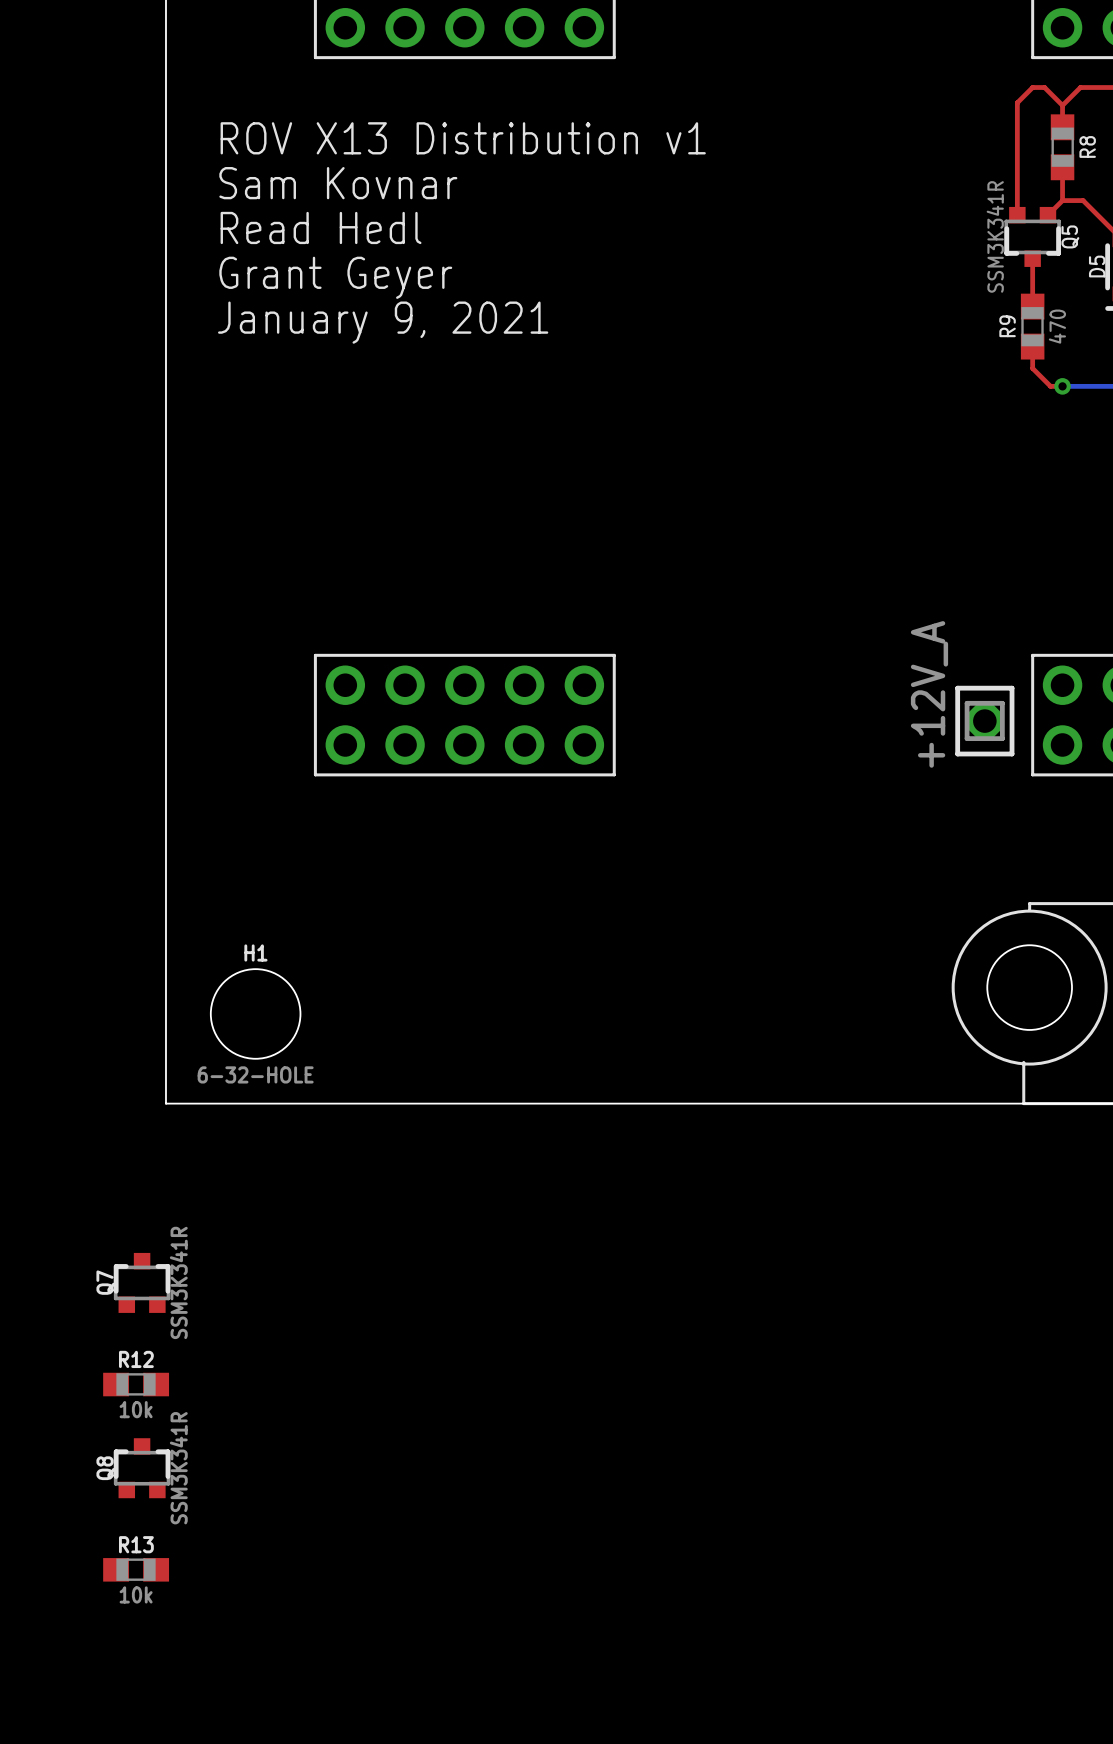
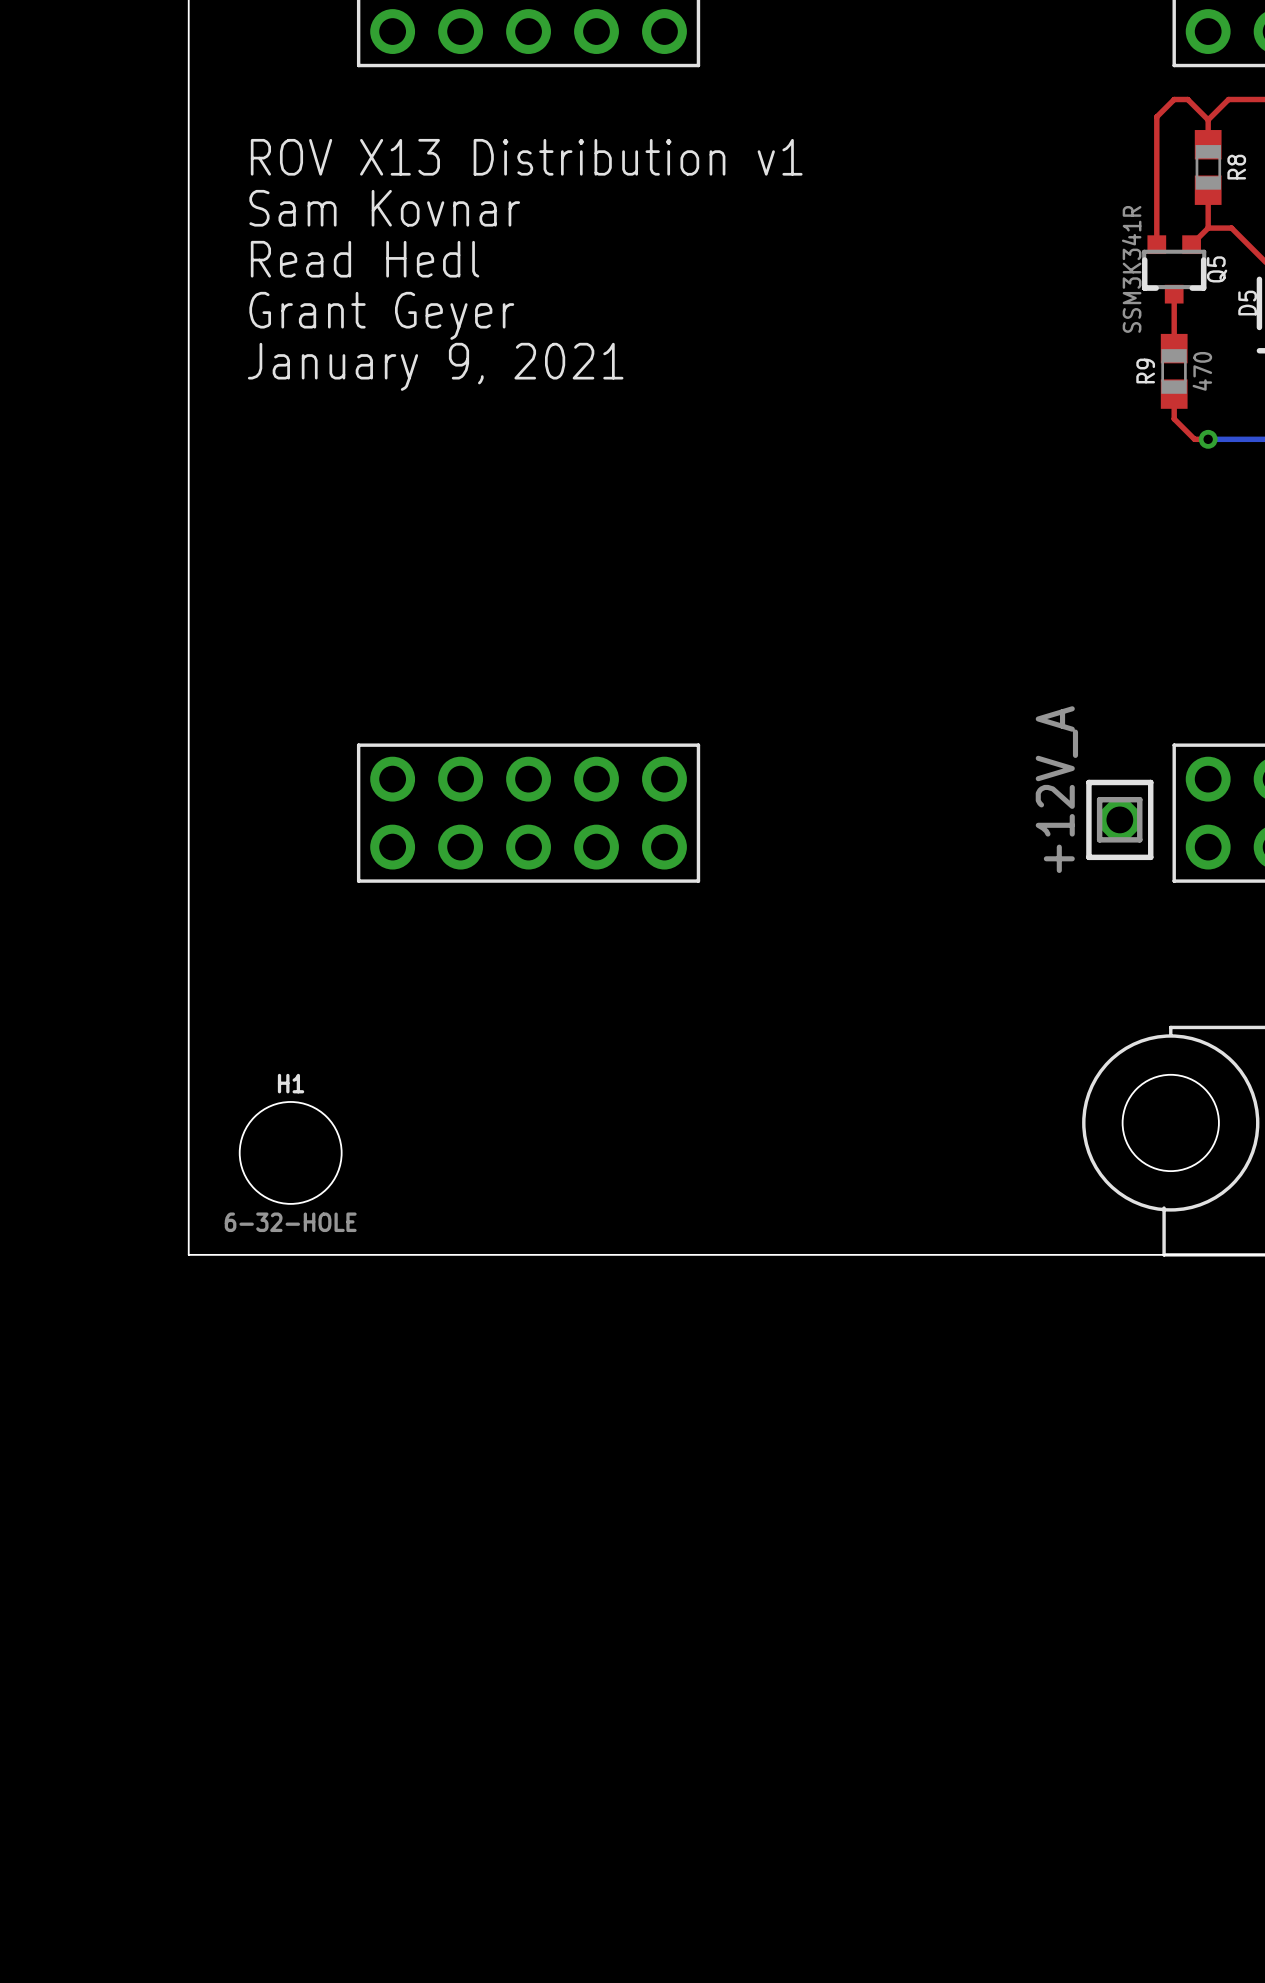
Q7: SSM3K341R (142, 1282) -> none
R12: 10k (136, 1384) -> none
Q8: SSM3K341R (142, 1468) -> none
R13: 10k (136, 1569) -> none

